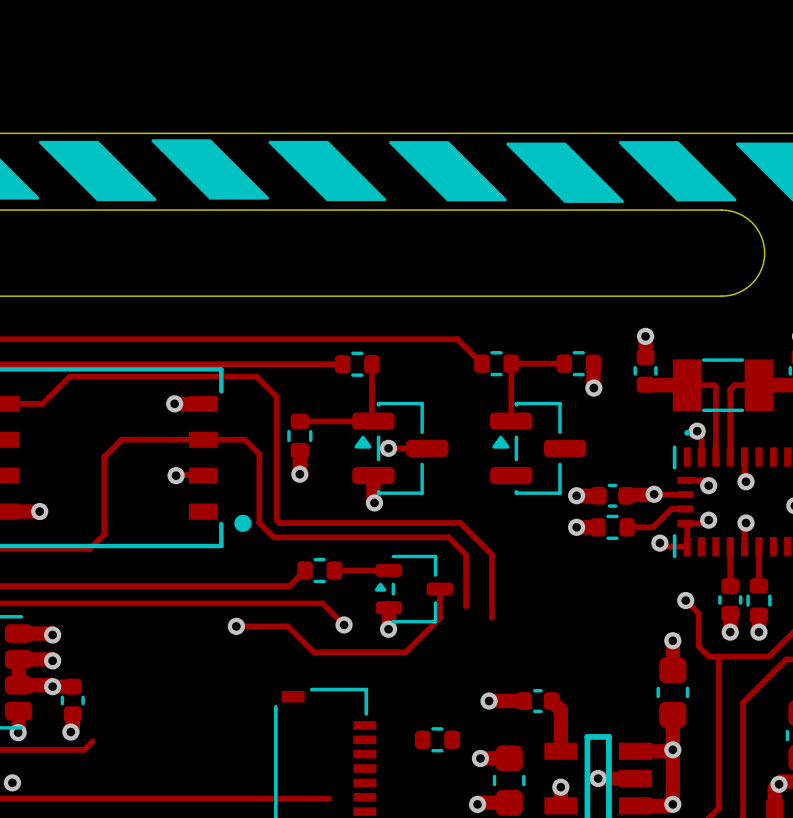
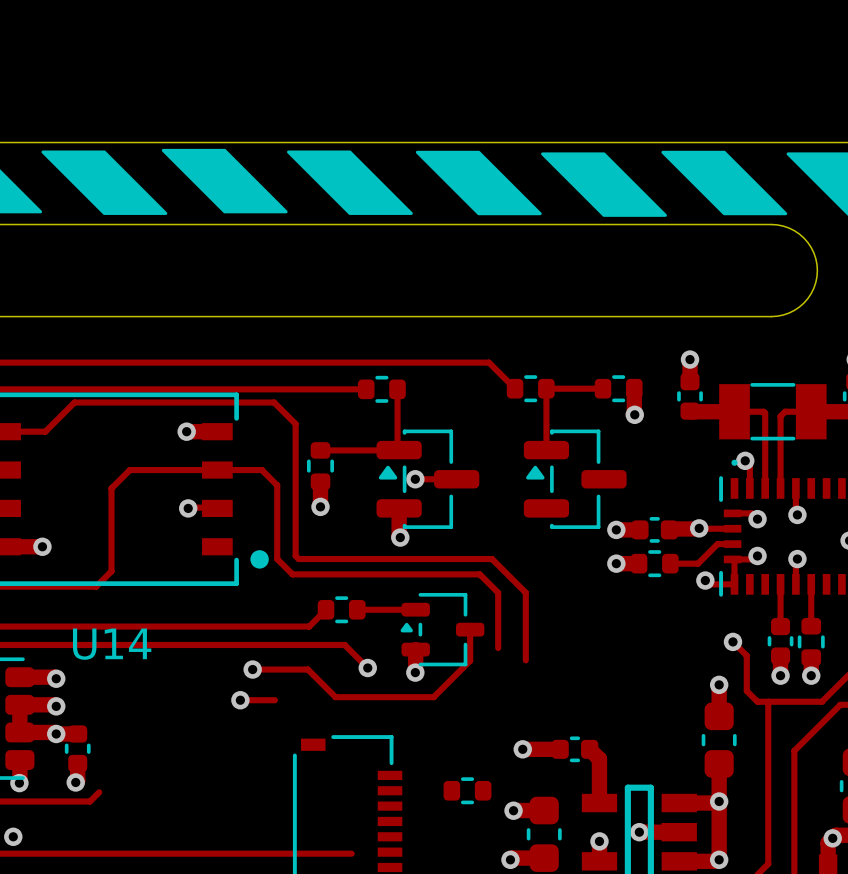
U14 name: none -> U14 (112, 644)
track: none -> (240, 700) (274, 700)
via: none -> (240, 700)

